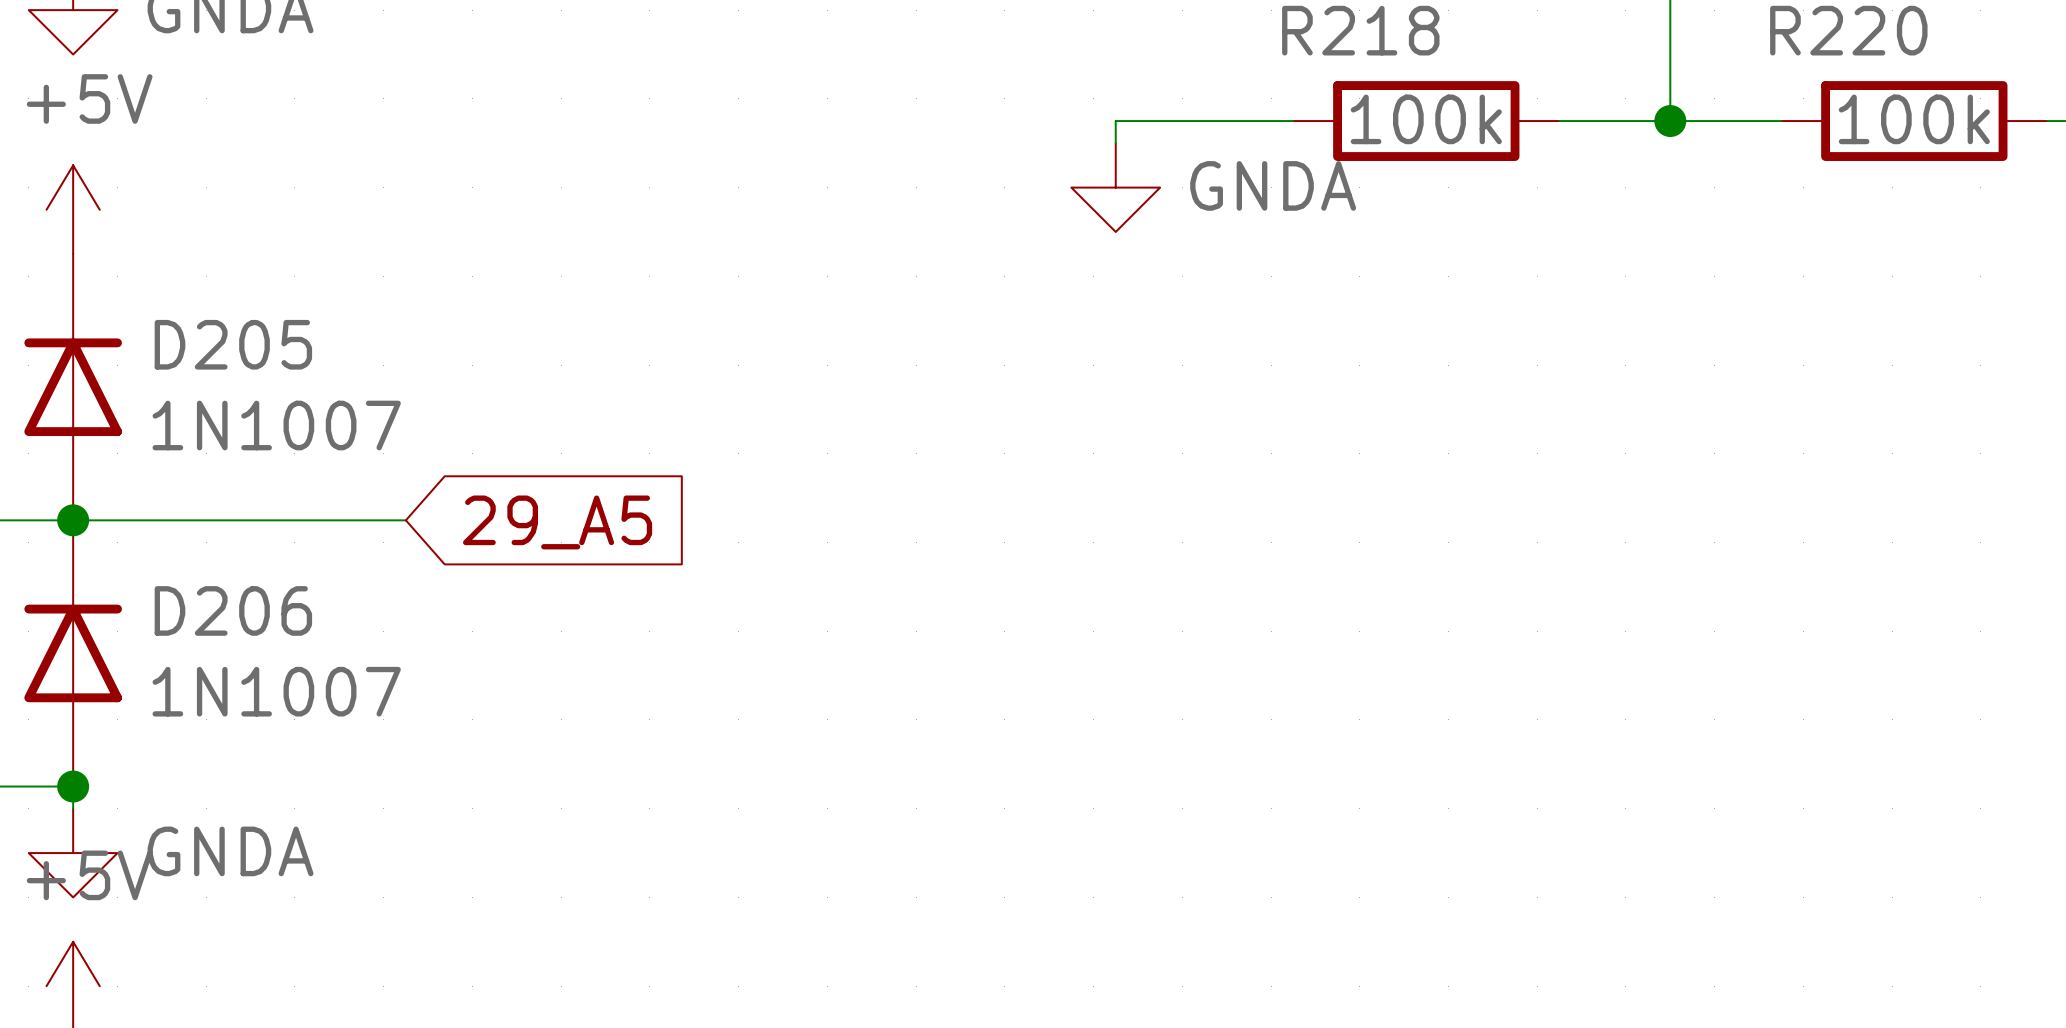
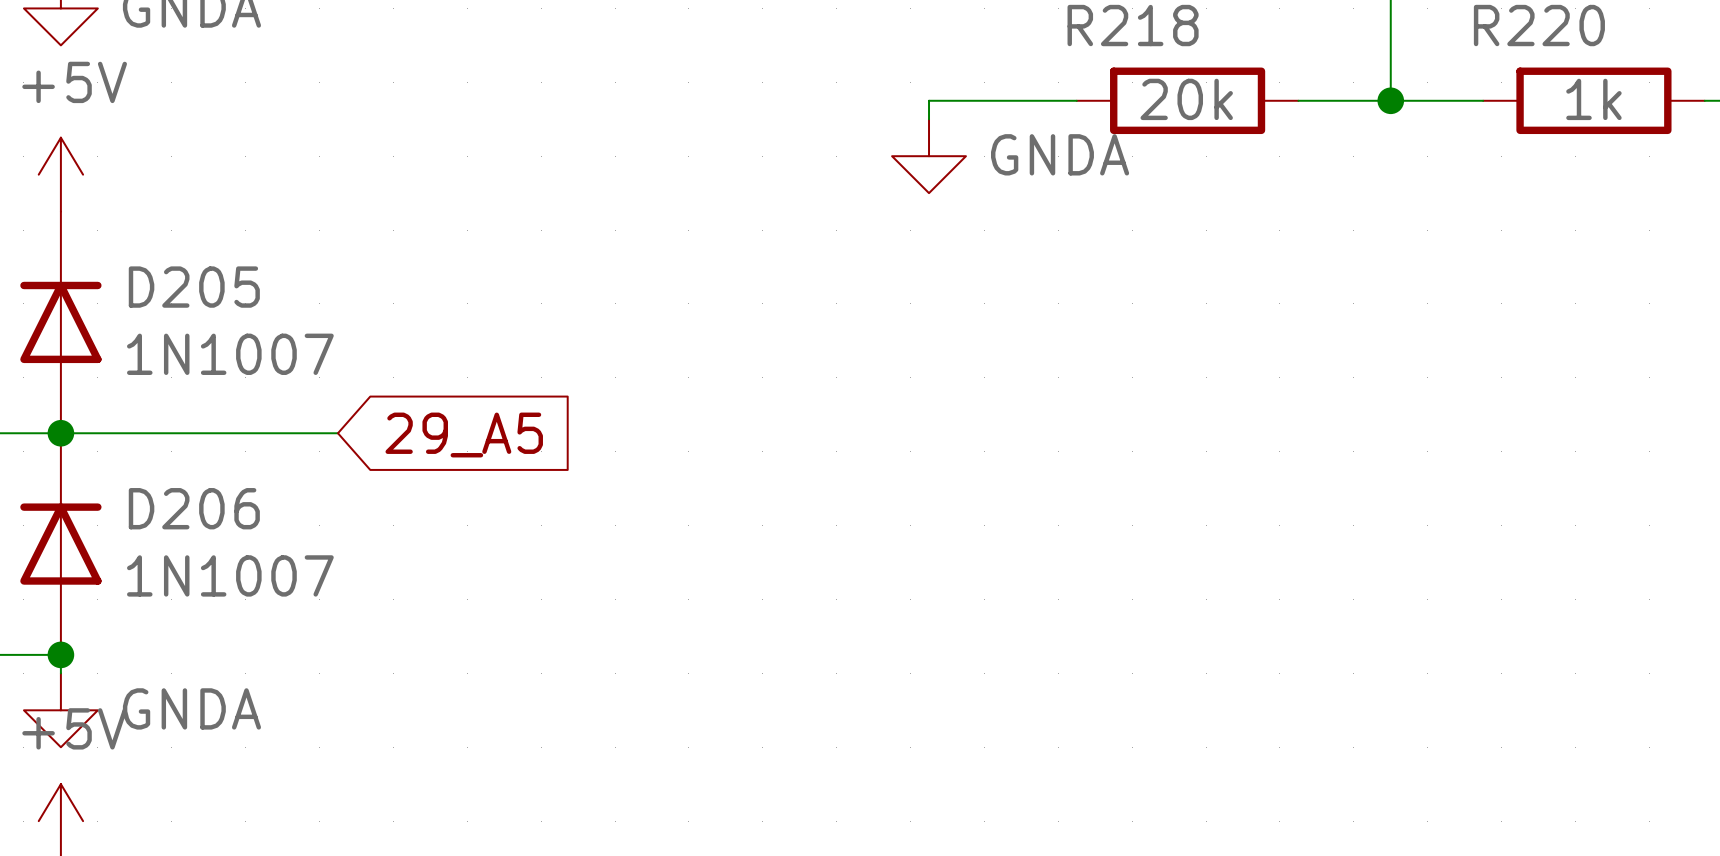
R218 value: 100k (1426, 119) -> 20k (1186, 99)
R220 value: 100k (1914, 119) -> 1k (1593, 99)

